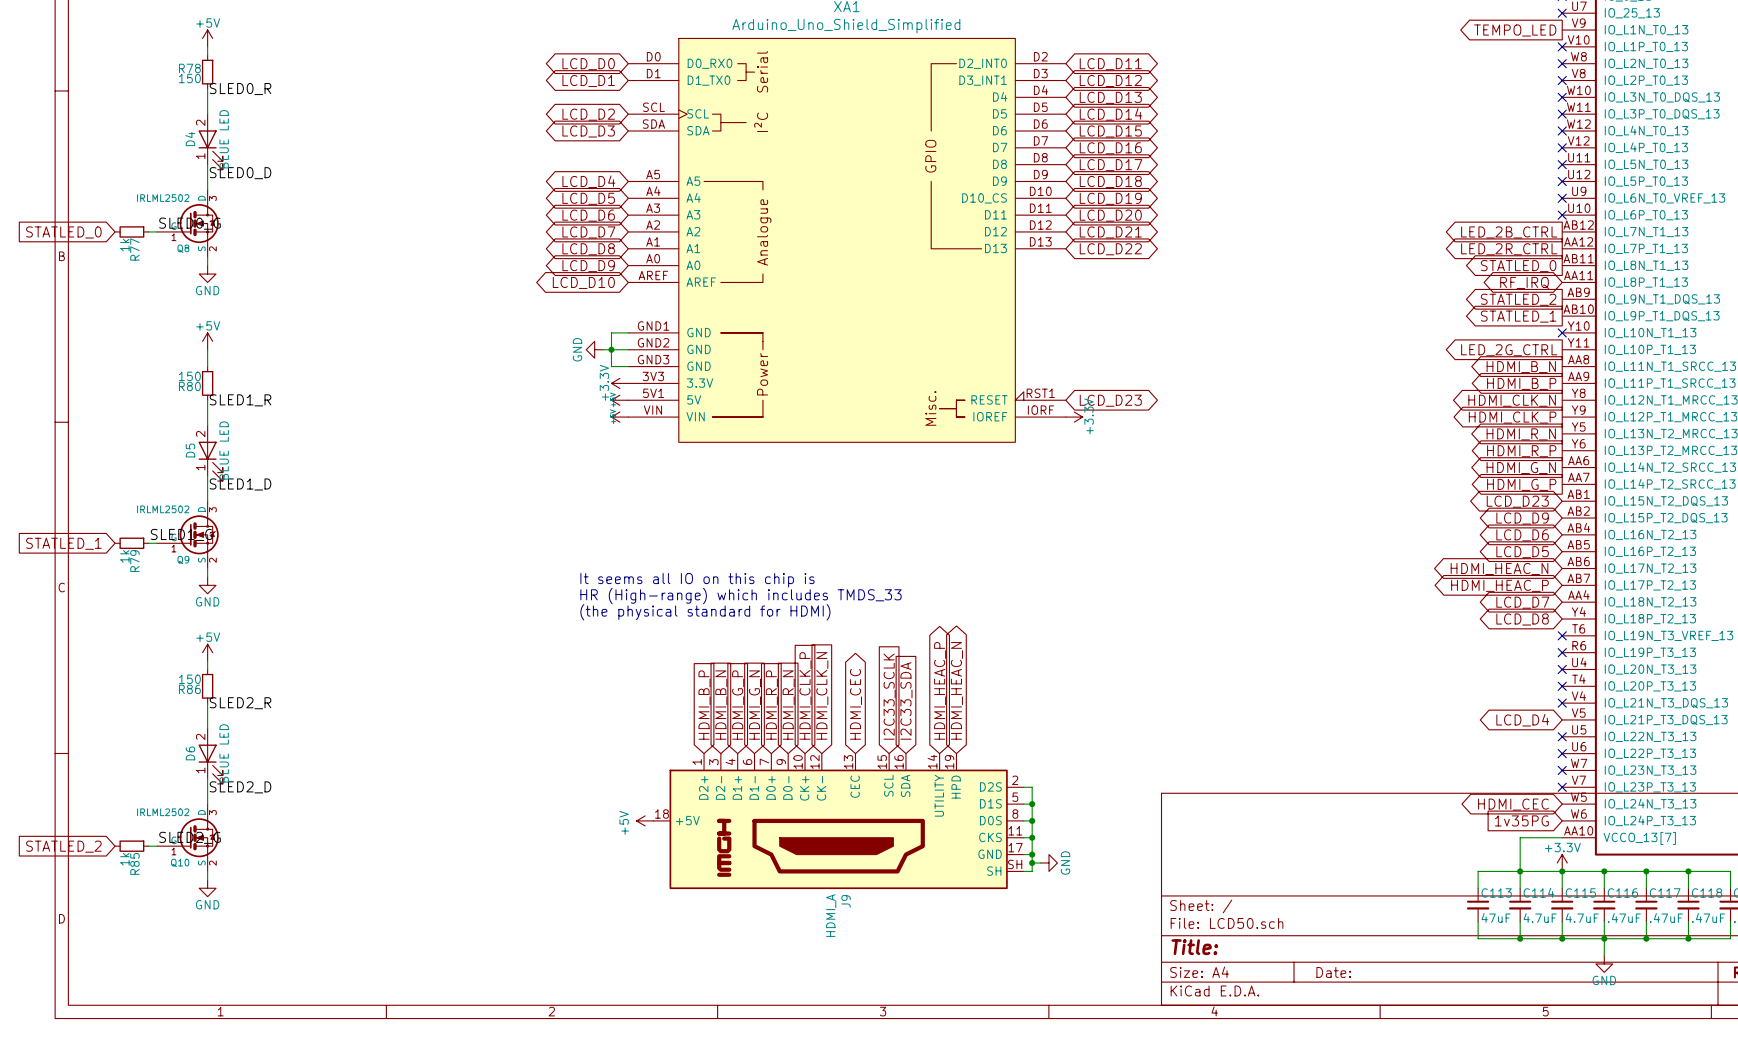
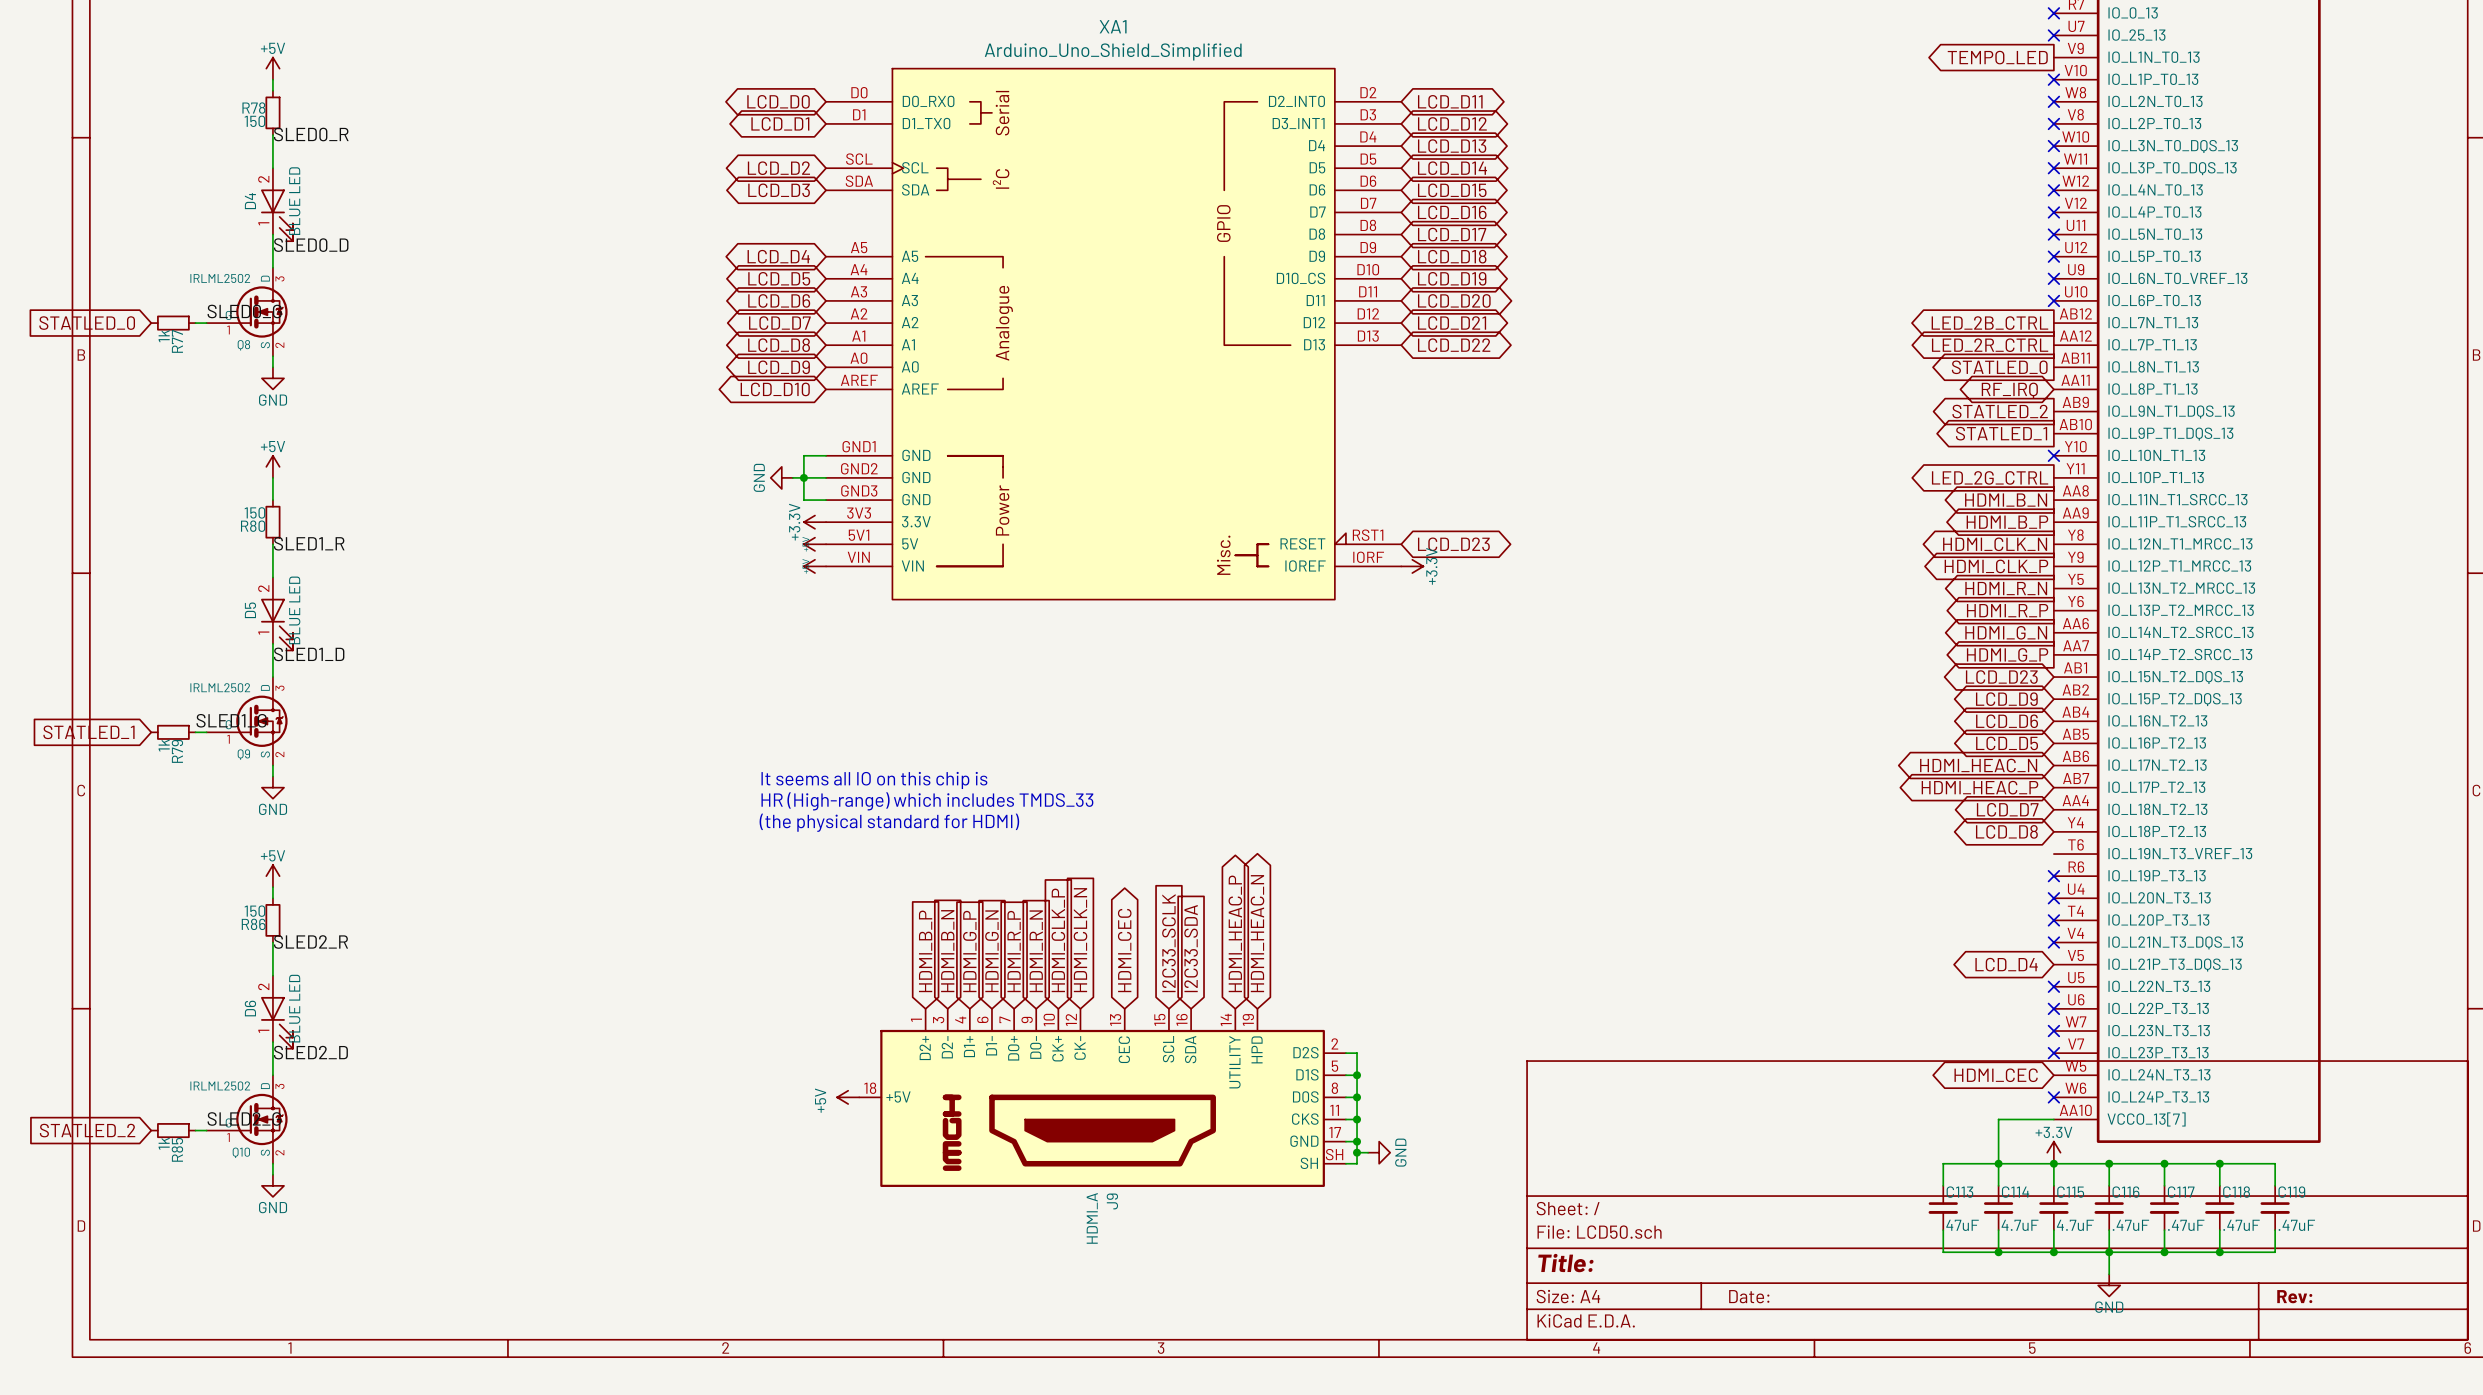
no-connect mark: (1562, 635) -> none
global label: 1v35PG (1521, 820) -> none
no-connect mark: none -> (2053, 1097)

